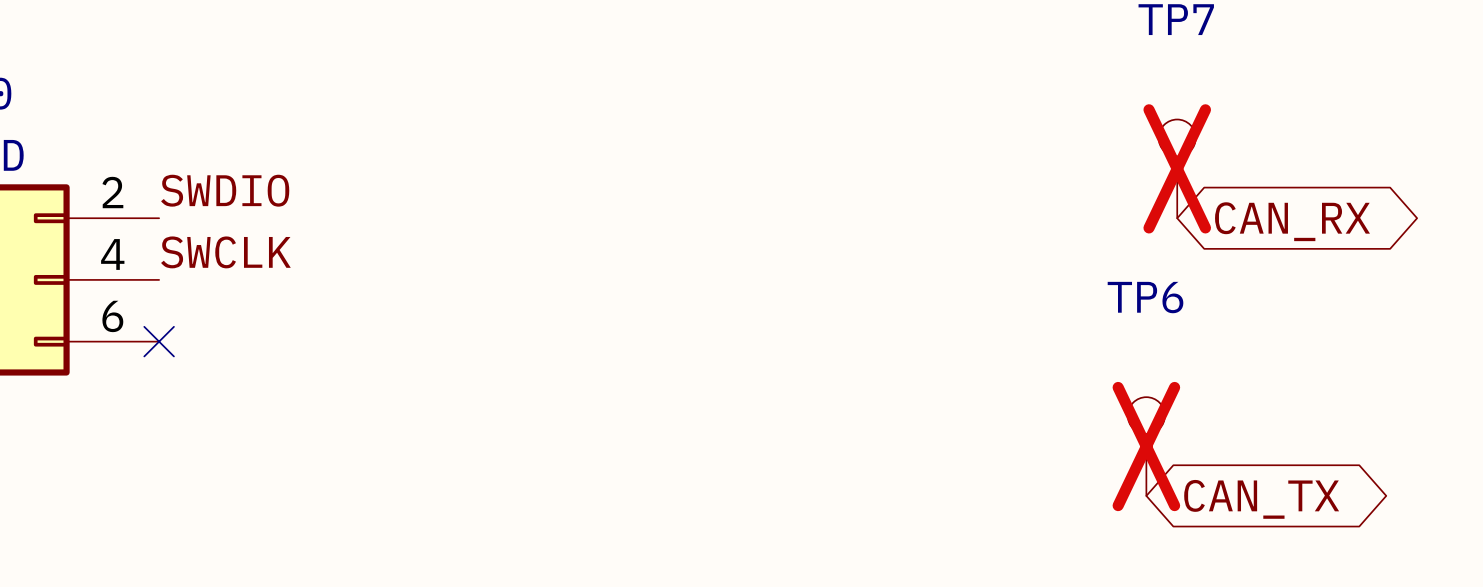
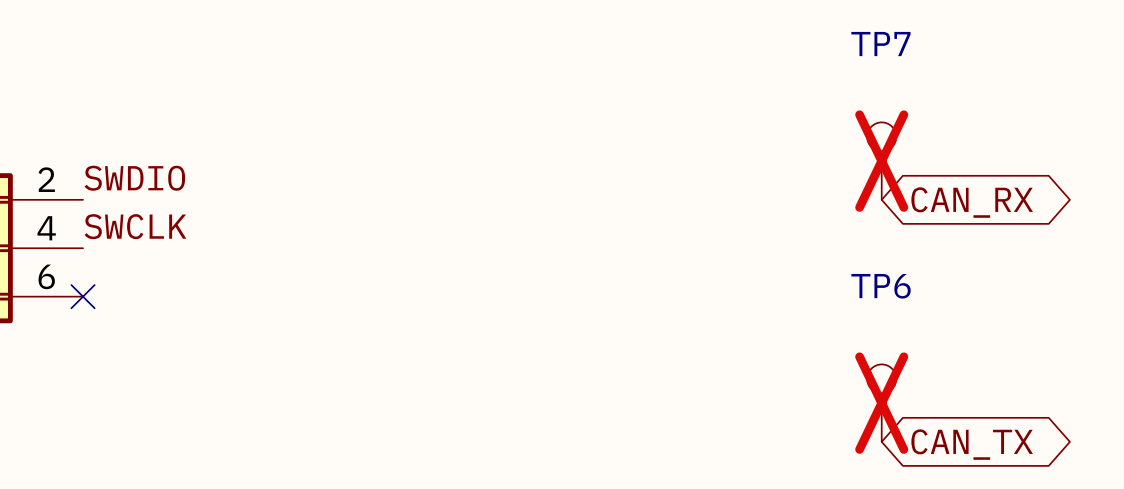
TP6 position: (1146, 446) -> (881, 403)
global label position: CAN_TX (1261, 499) -> CAN_TX (972, 444)

